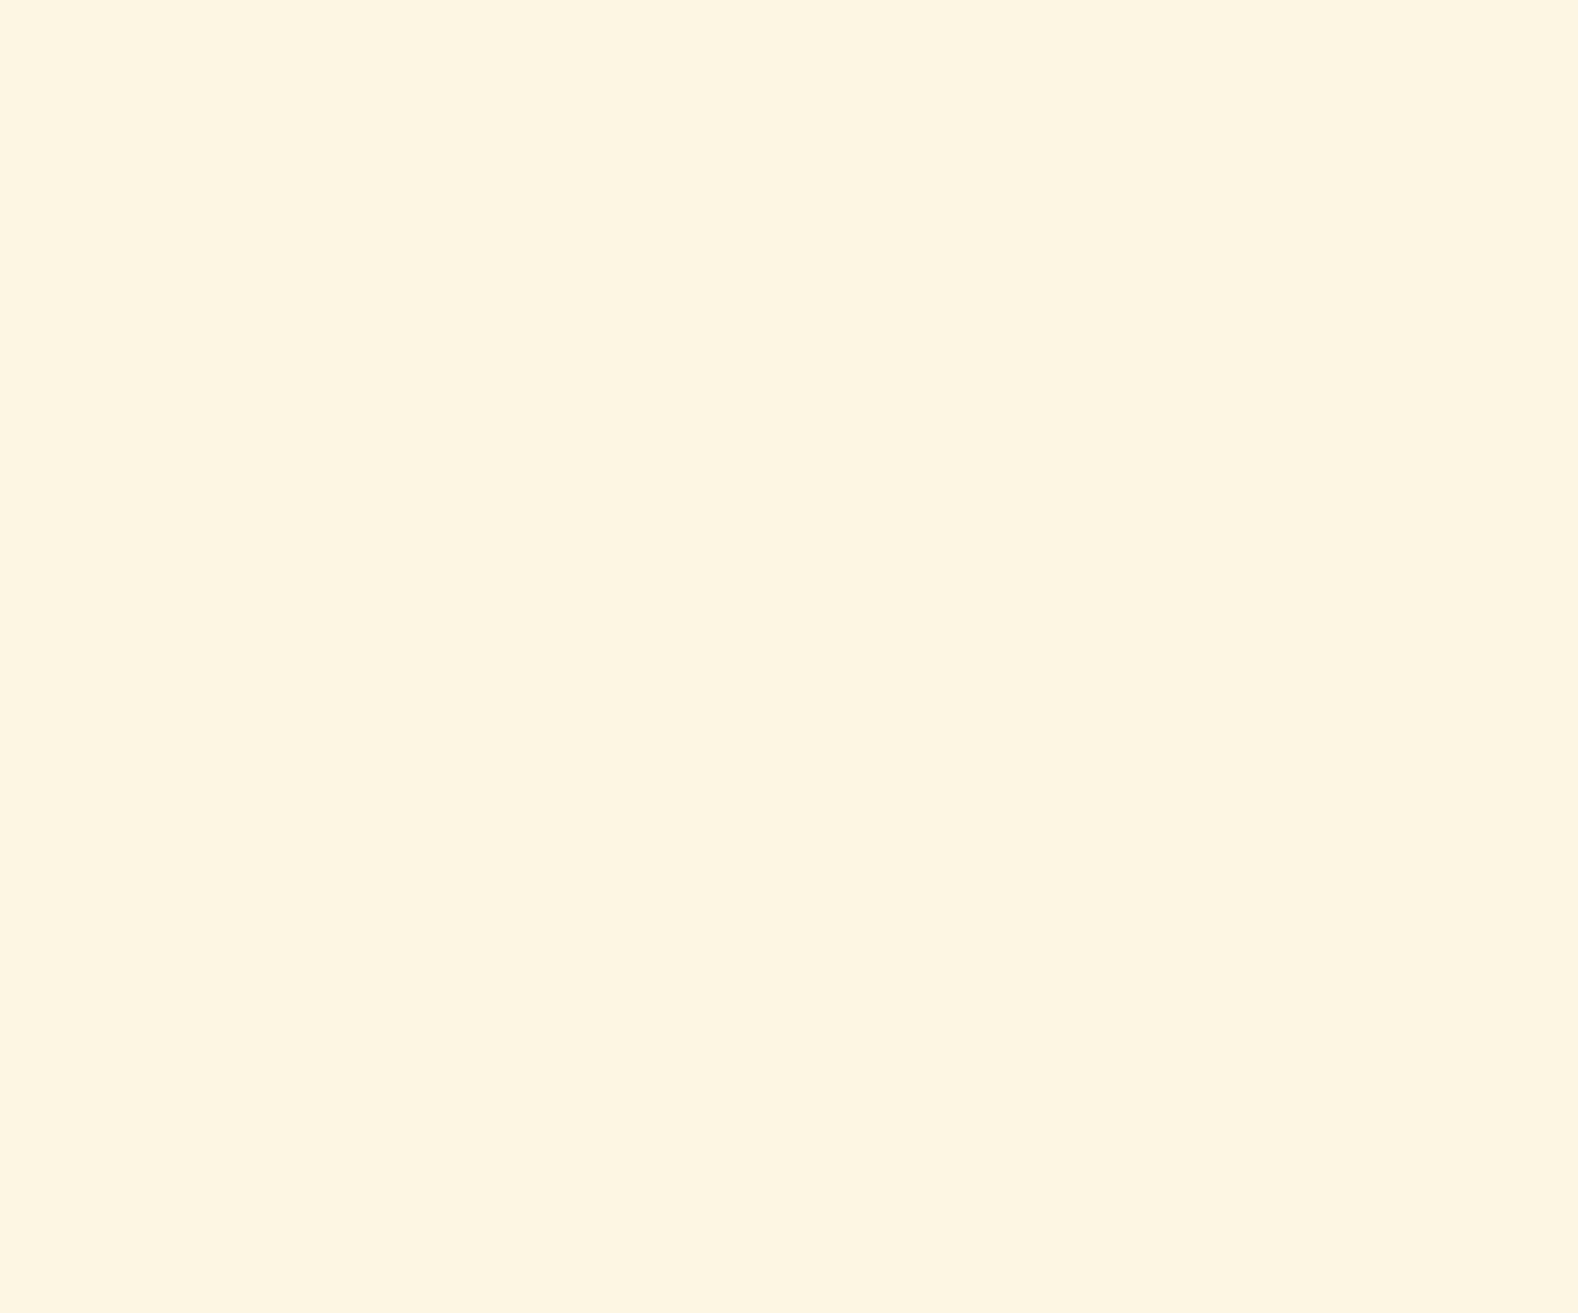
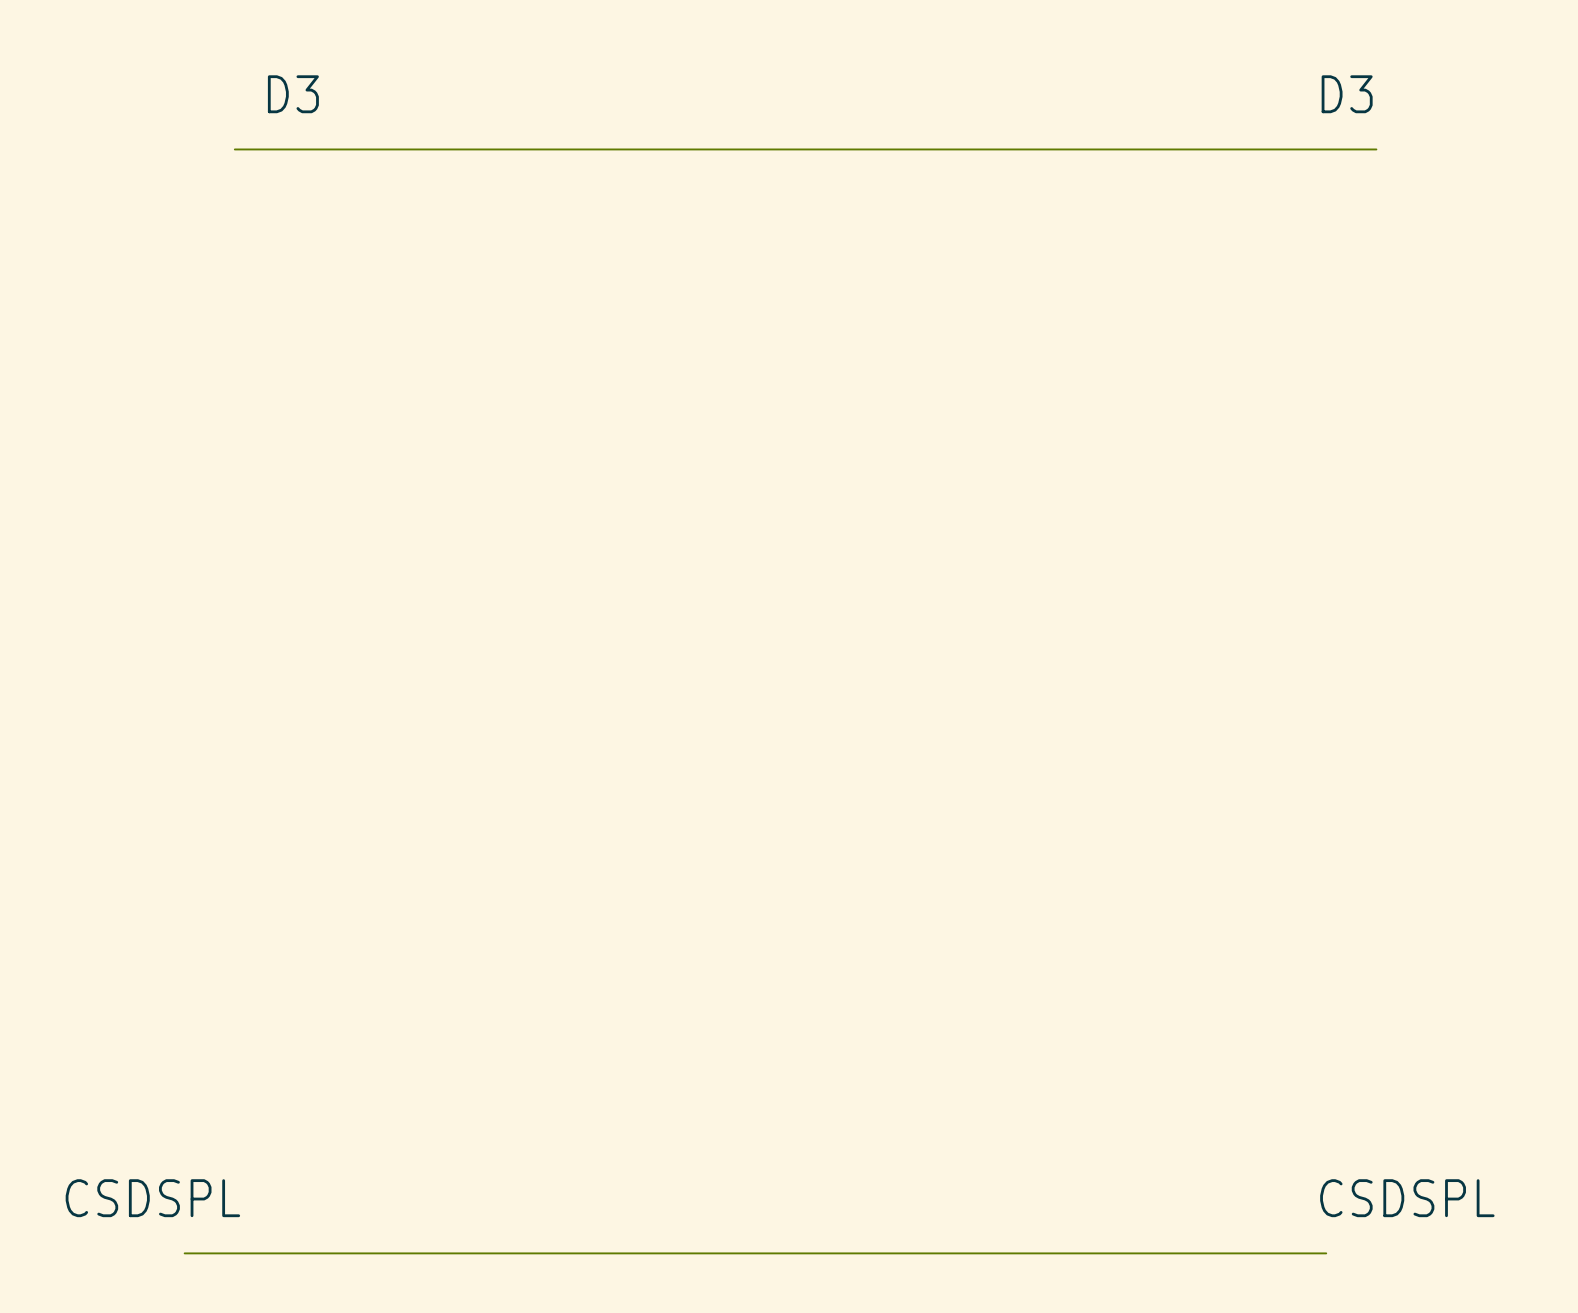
label: none -> D3 (293, 94)
label: none -> D3 (1347, 94)
wire: none -> (234, 149) (1376, 149)
label: none -> CSDSPL (152, 1198)
label: none -> CSDSPL (1407, 1198)
wire: none -> (184, 1253) (1326, 1253)

